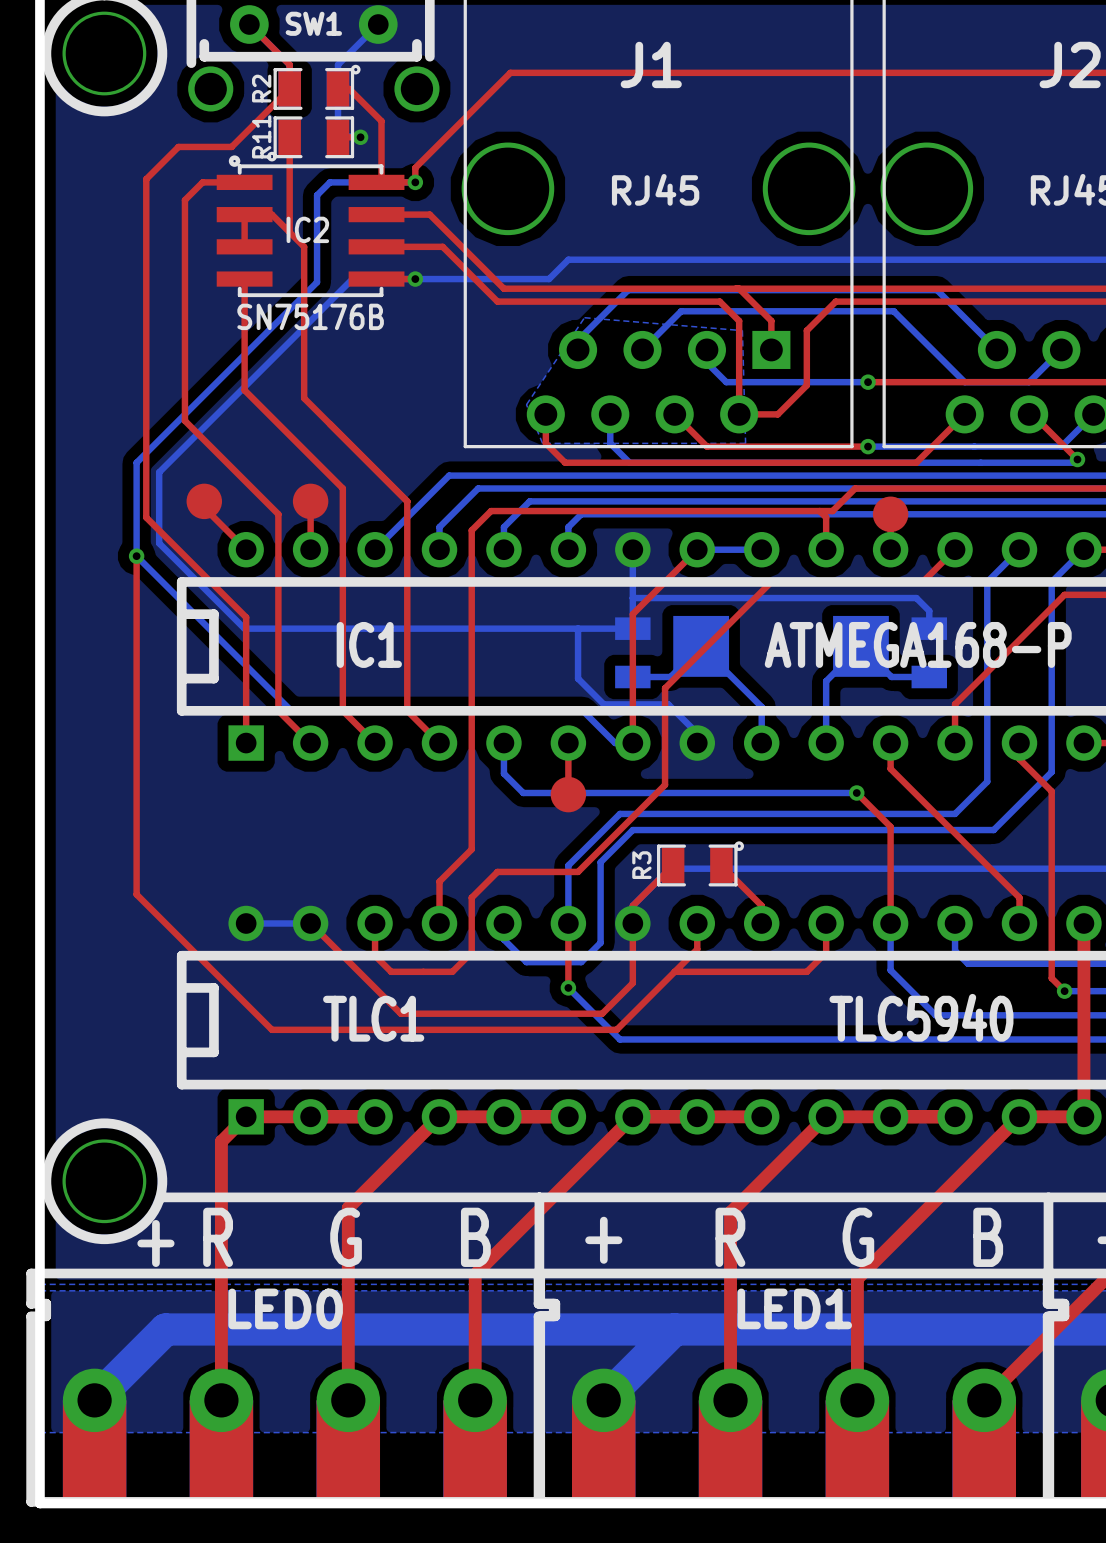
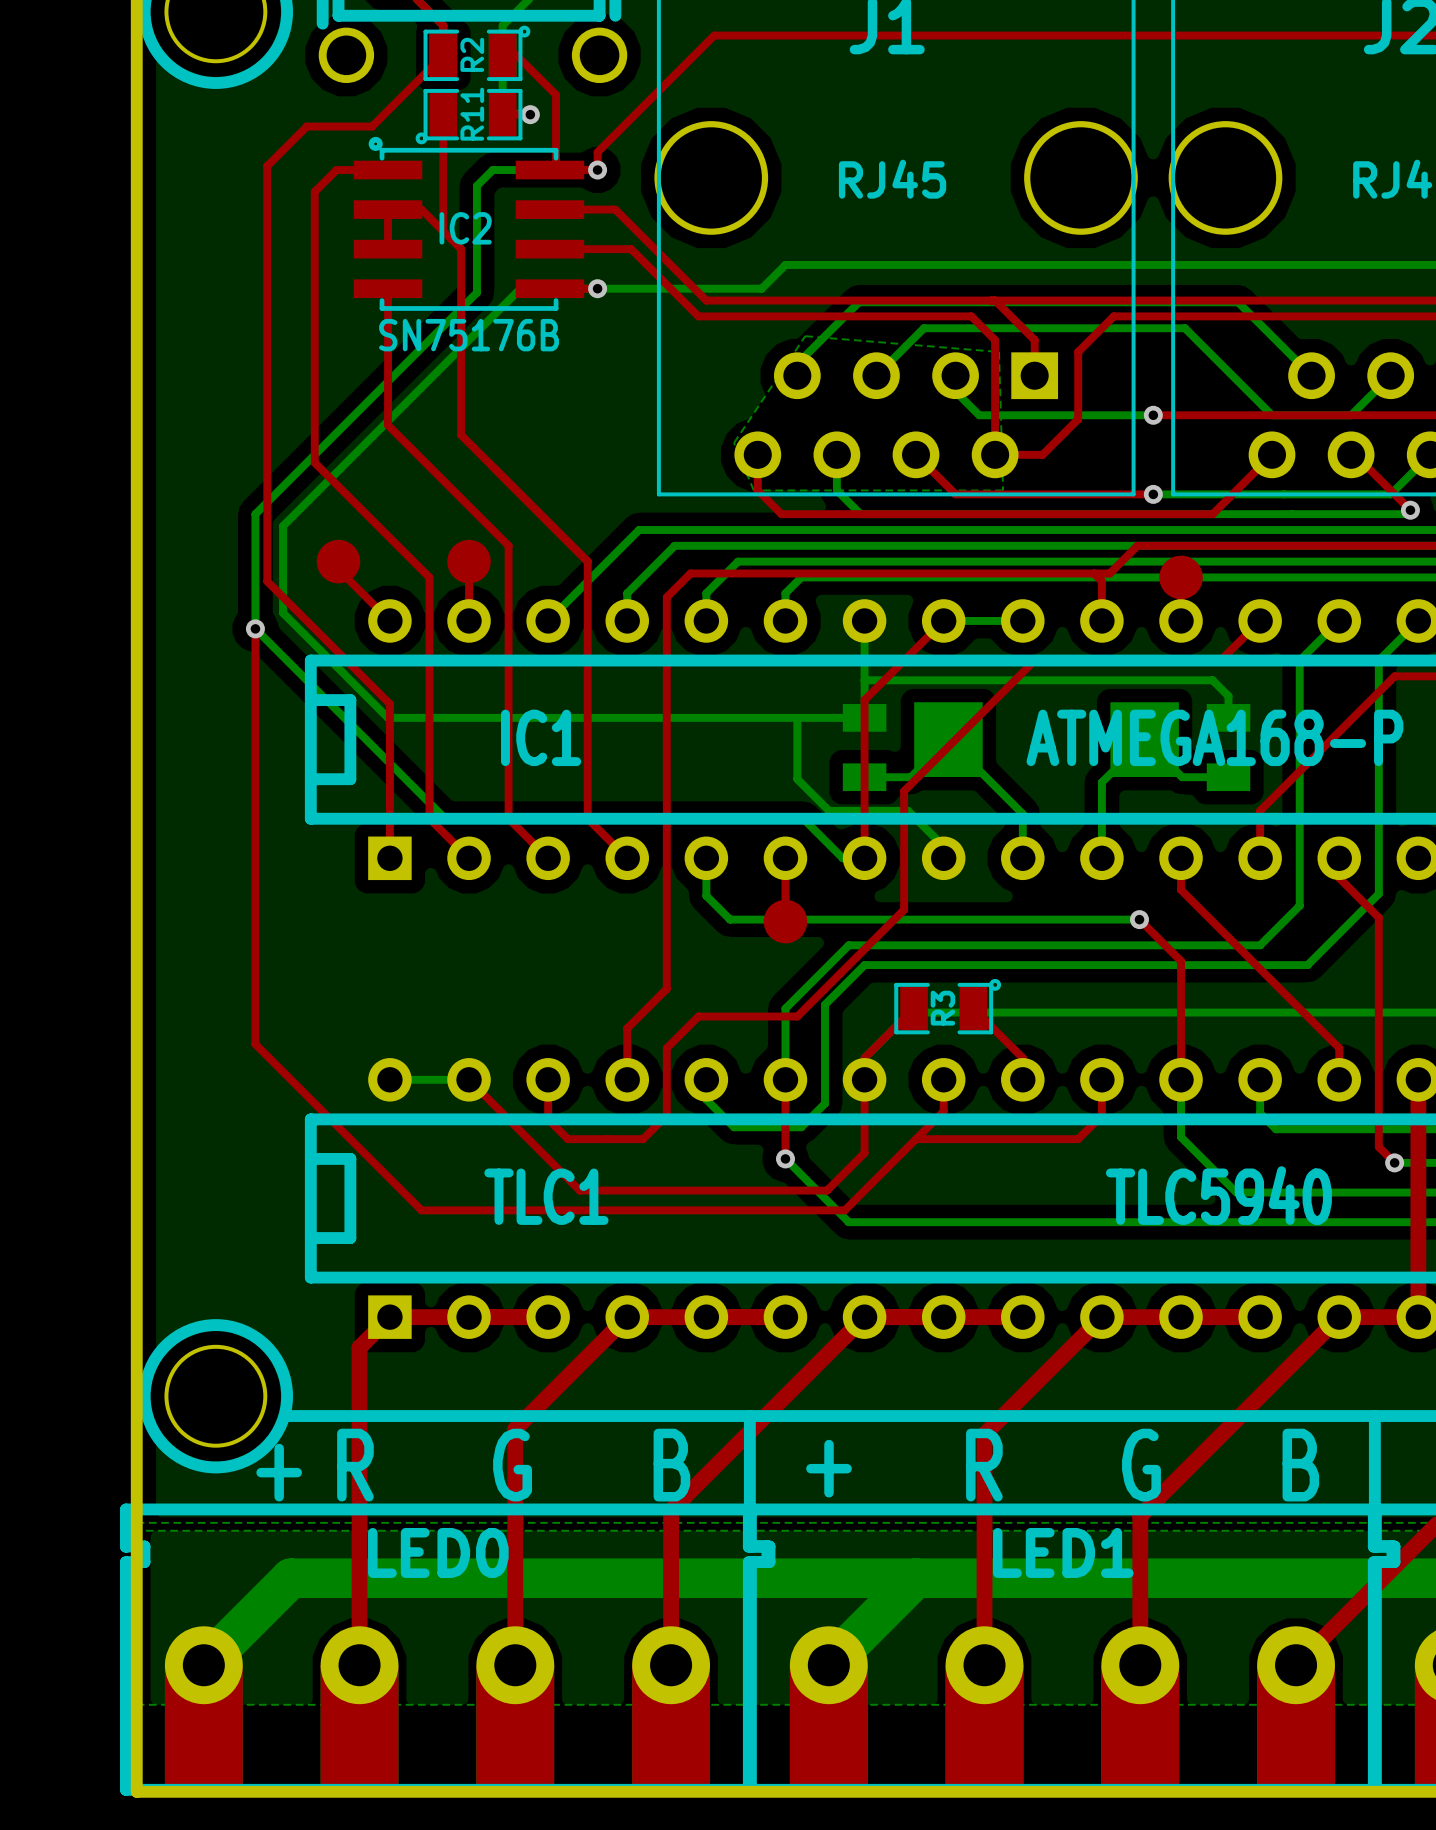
R2 name position: R2 (261, 88) -> R2 (472, 54)
R11 name position: R11 (261, 136) -> R11 (472, 114)
R3 name position: R3 (641, 865) -> R3 (942, 1008)

